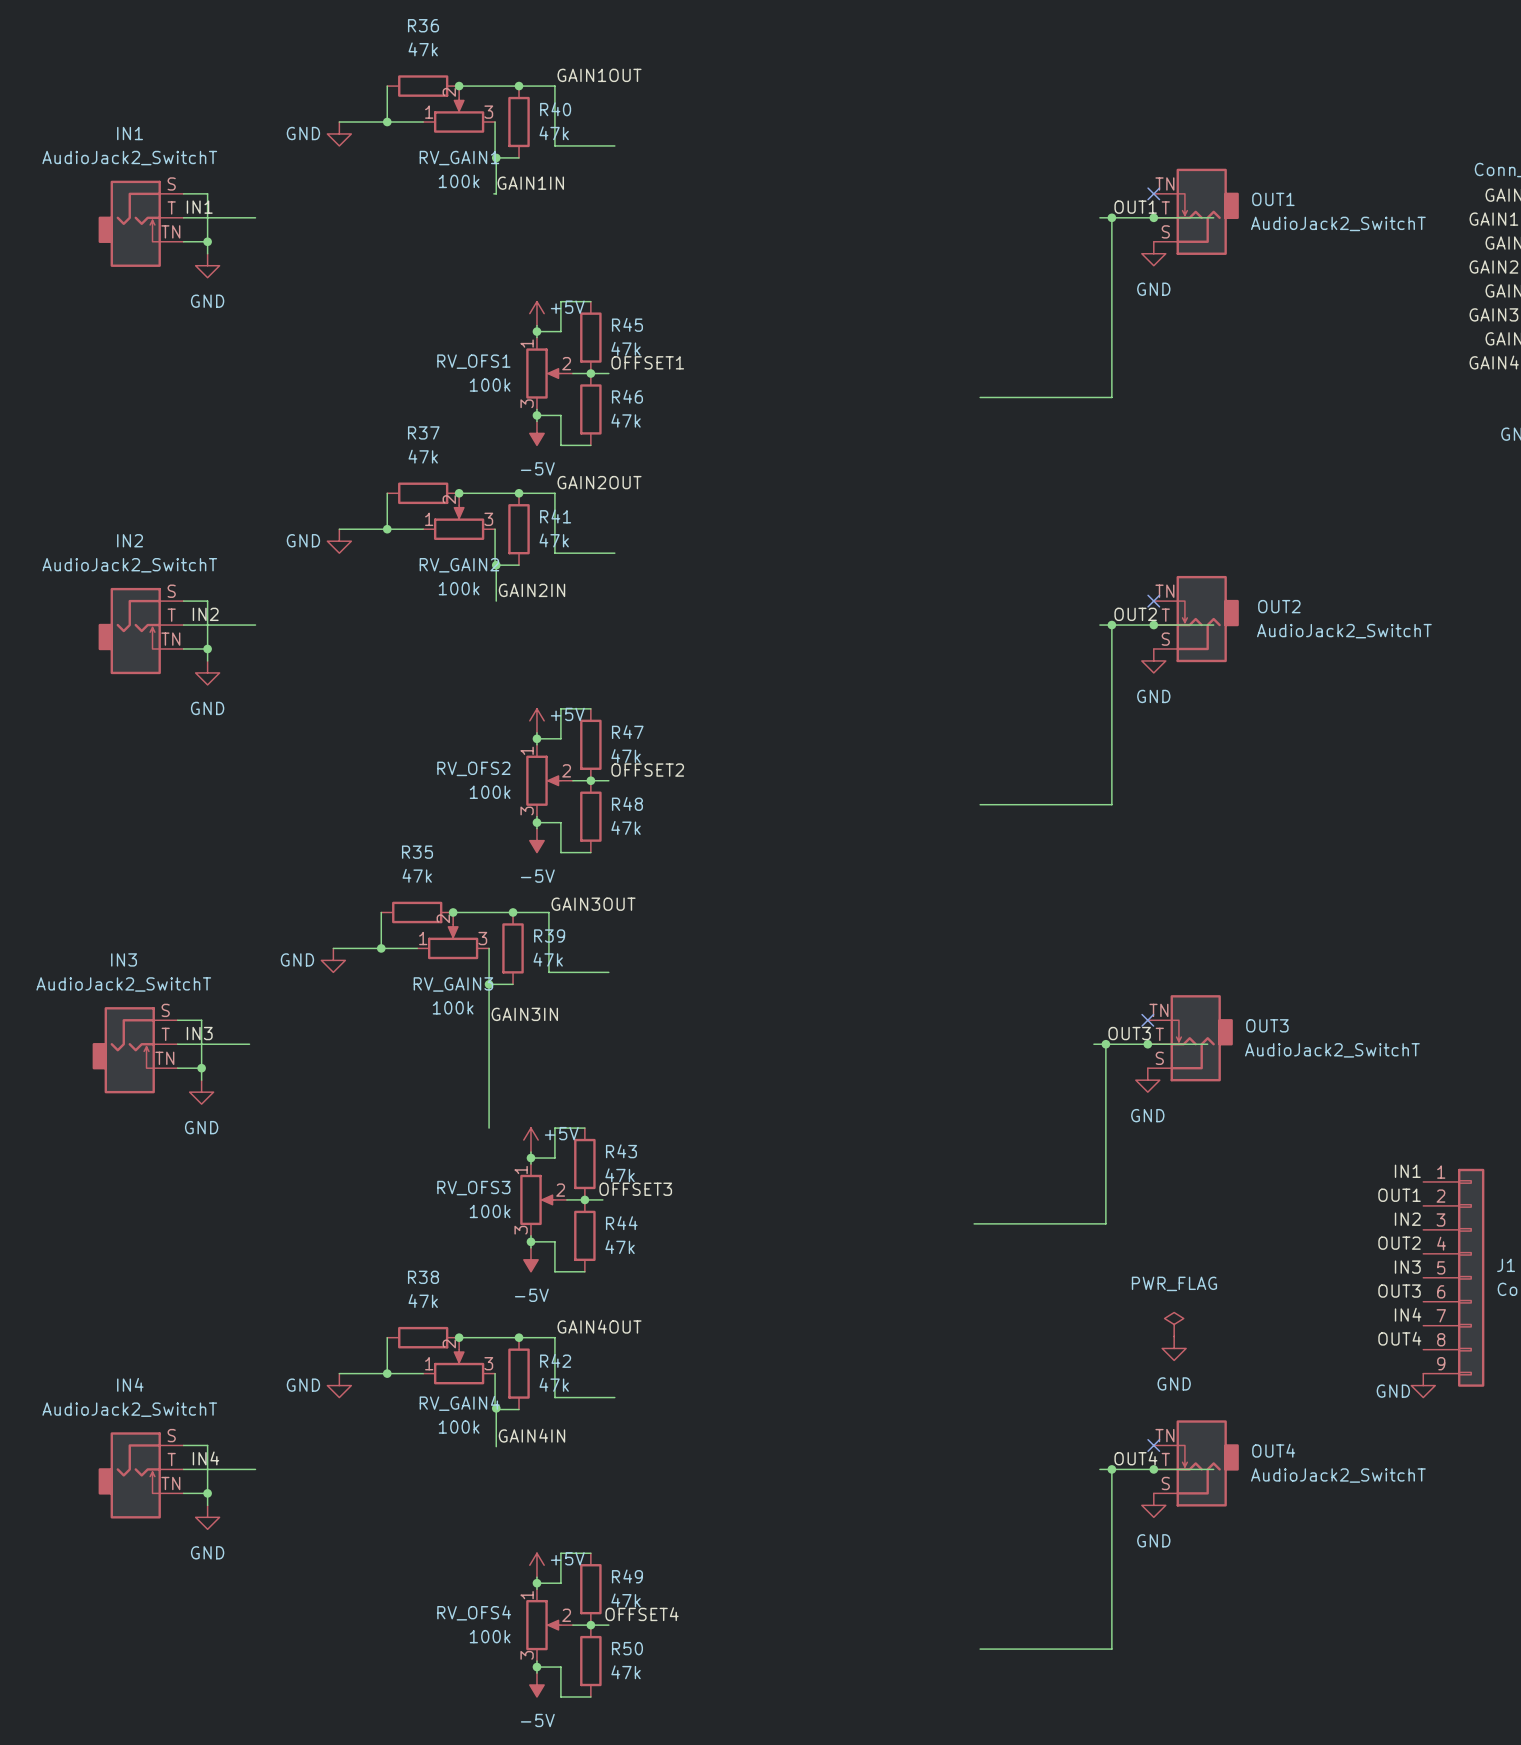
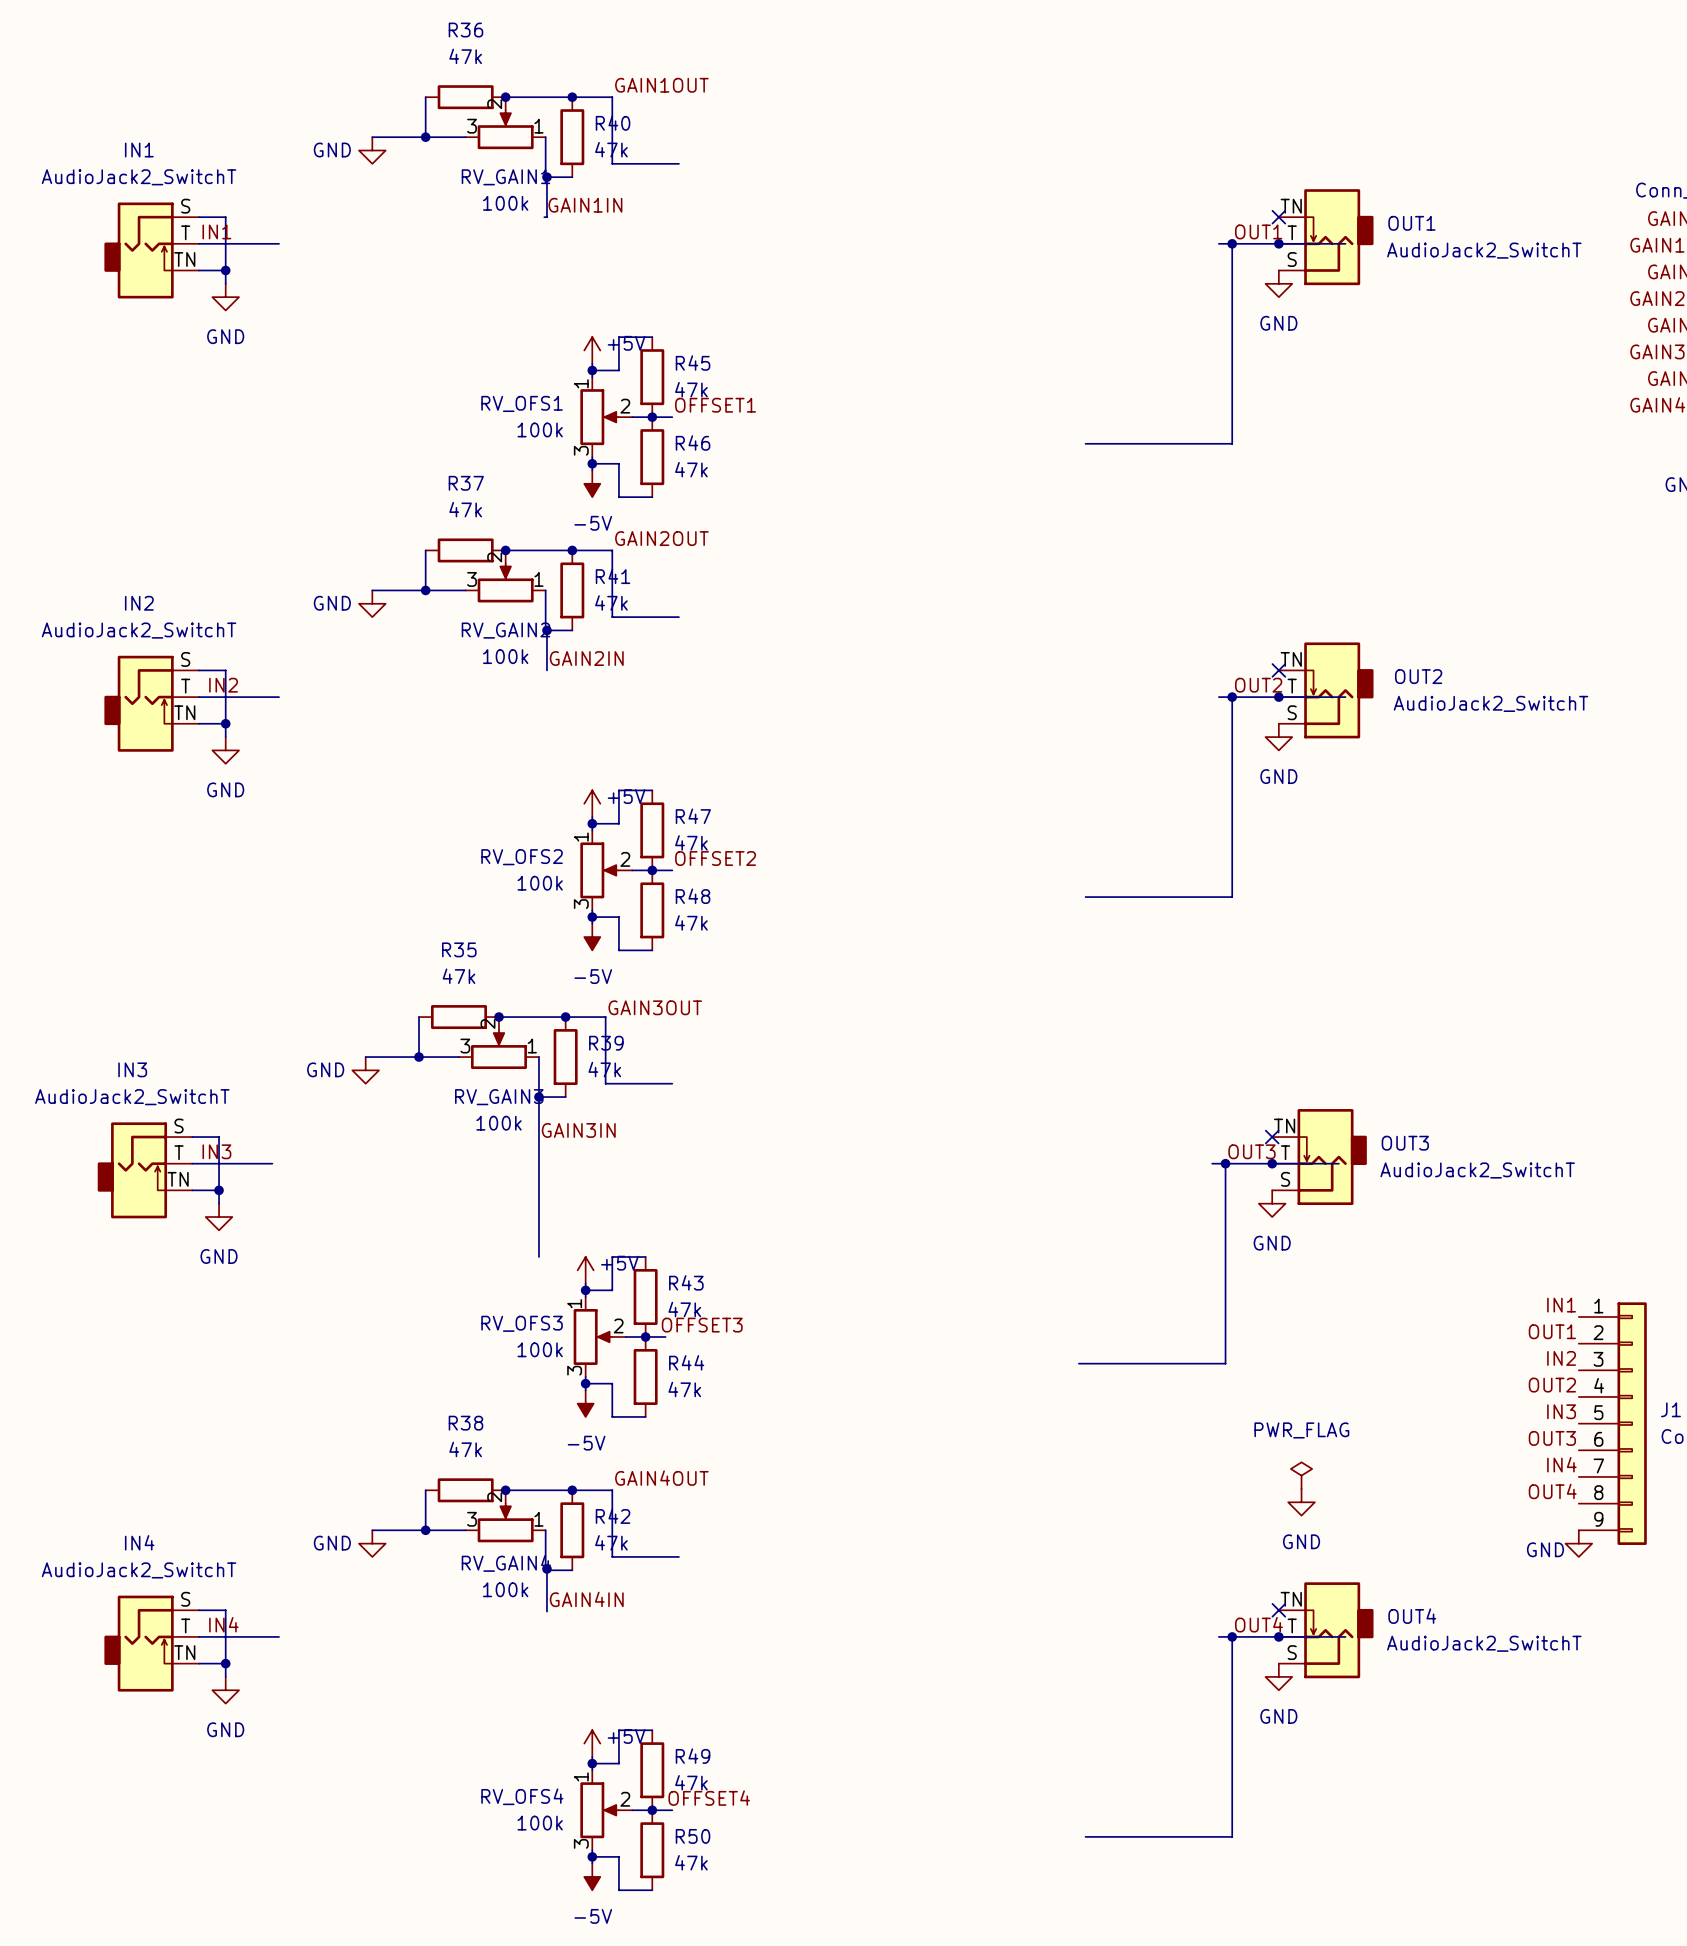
RV_GAIN1 flip: as is (459, 115) -> left-right (505, 129)
RV_GAIN2 flip: as is (459, 522) -> left-right (505, 583)
RV_GAIN3 flip: as is (453, 941) -> left-right (498, 1049)
RV_GAIN4 flip: as is (459, 1367) -> left-right (505, 1522)

